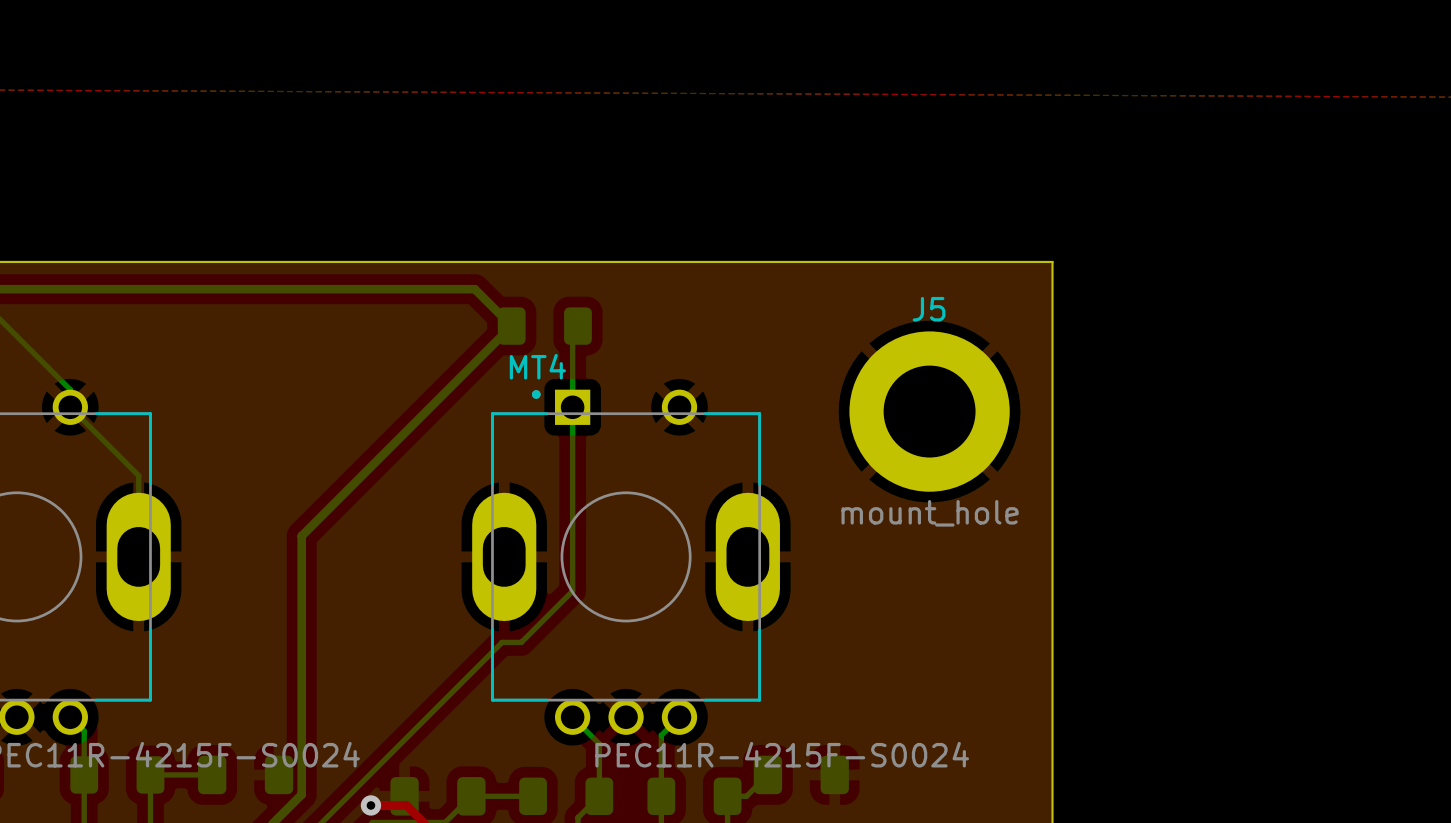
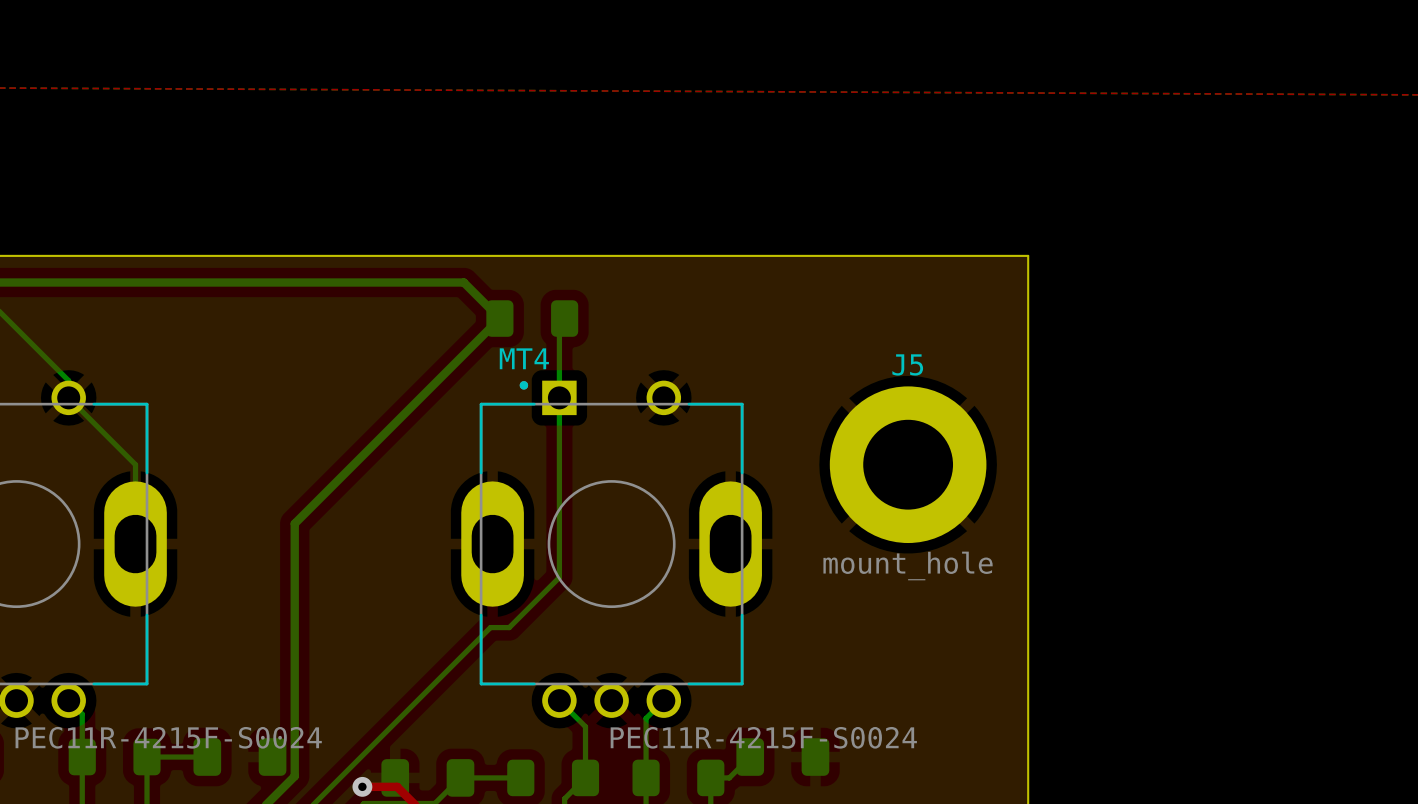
J5 position: (929, 411) -> (908, 464)

